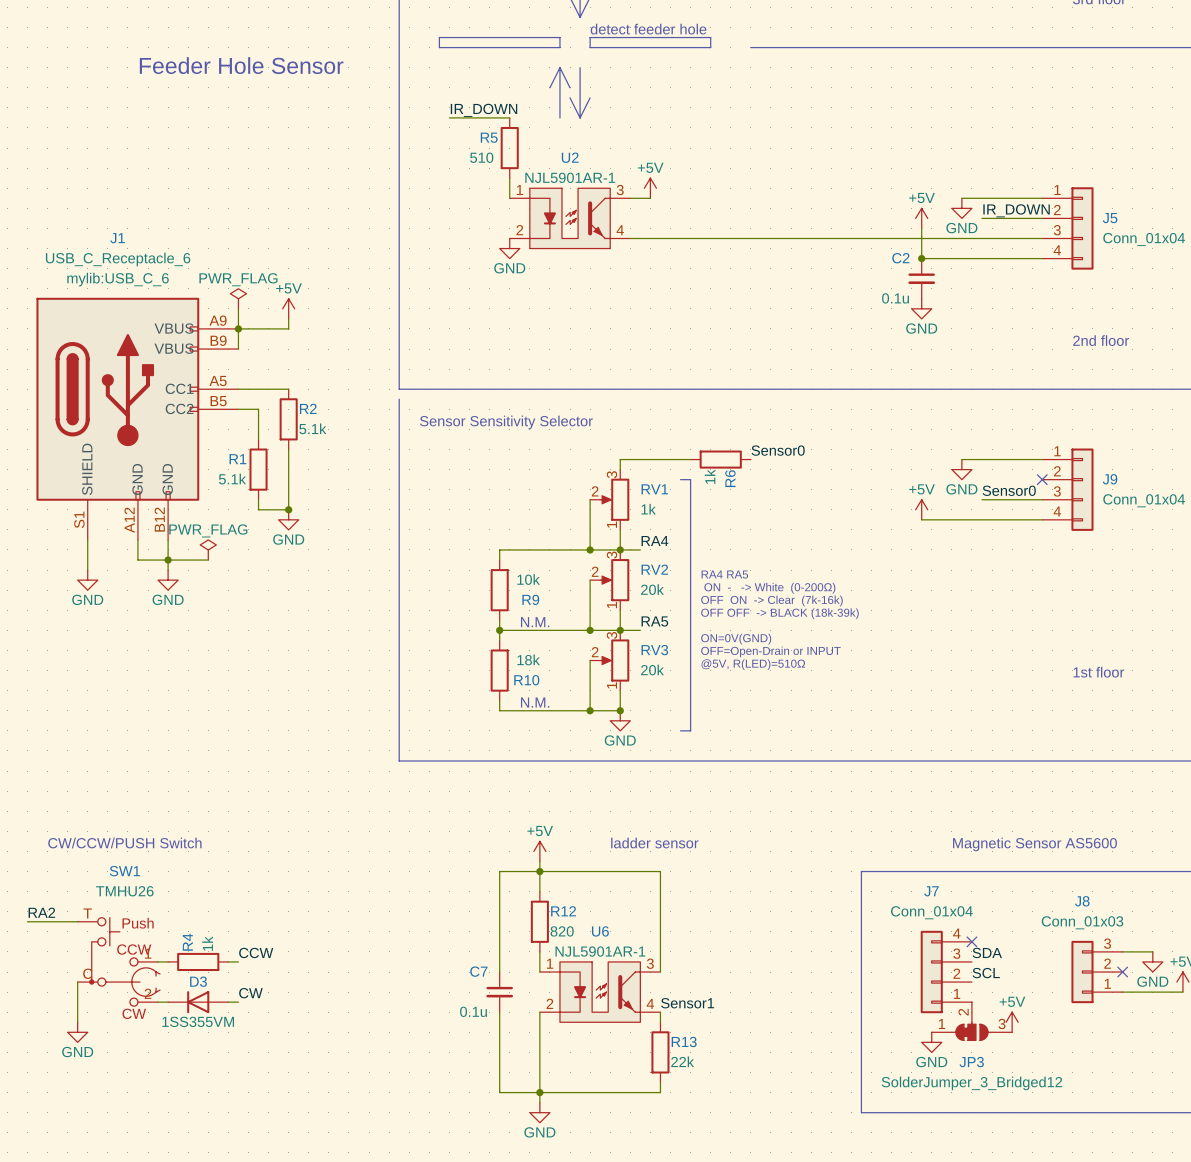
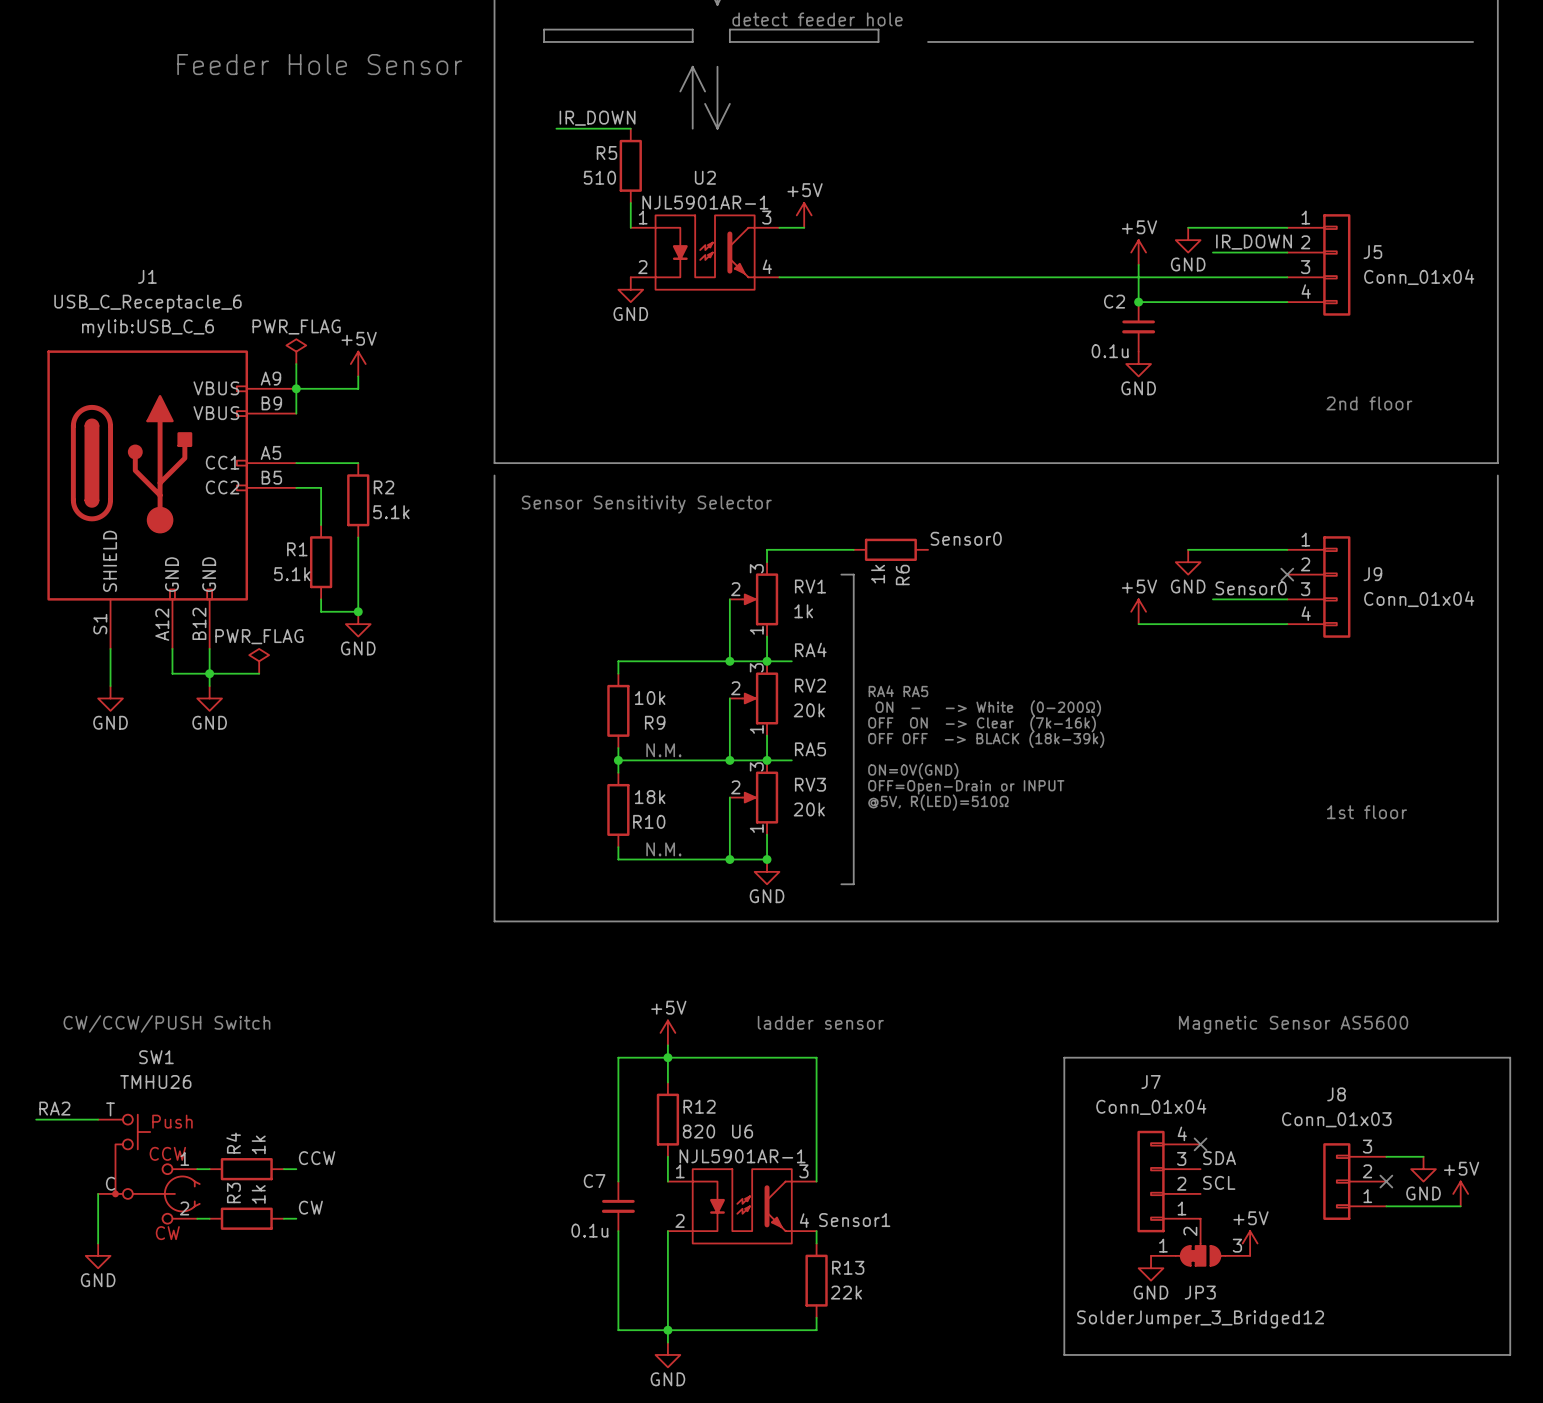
D3: 1SS355VM (198, 1002) -> none
R3: none -> 1k (246, 1218)

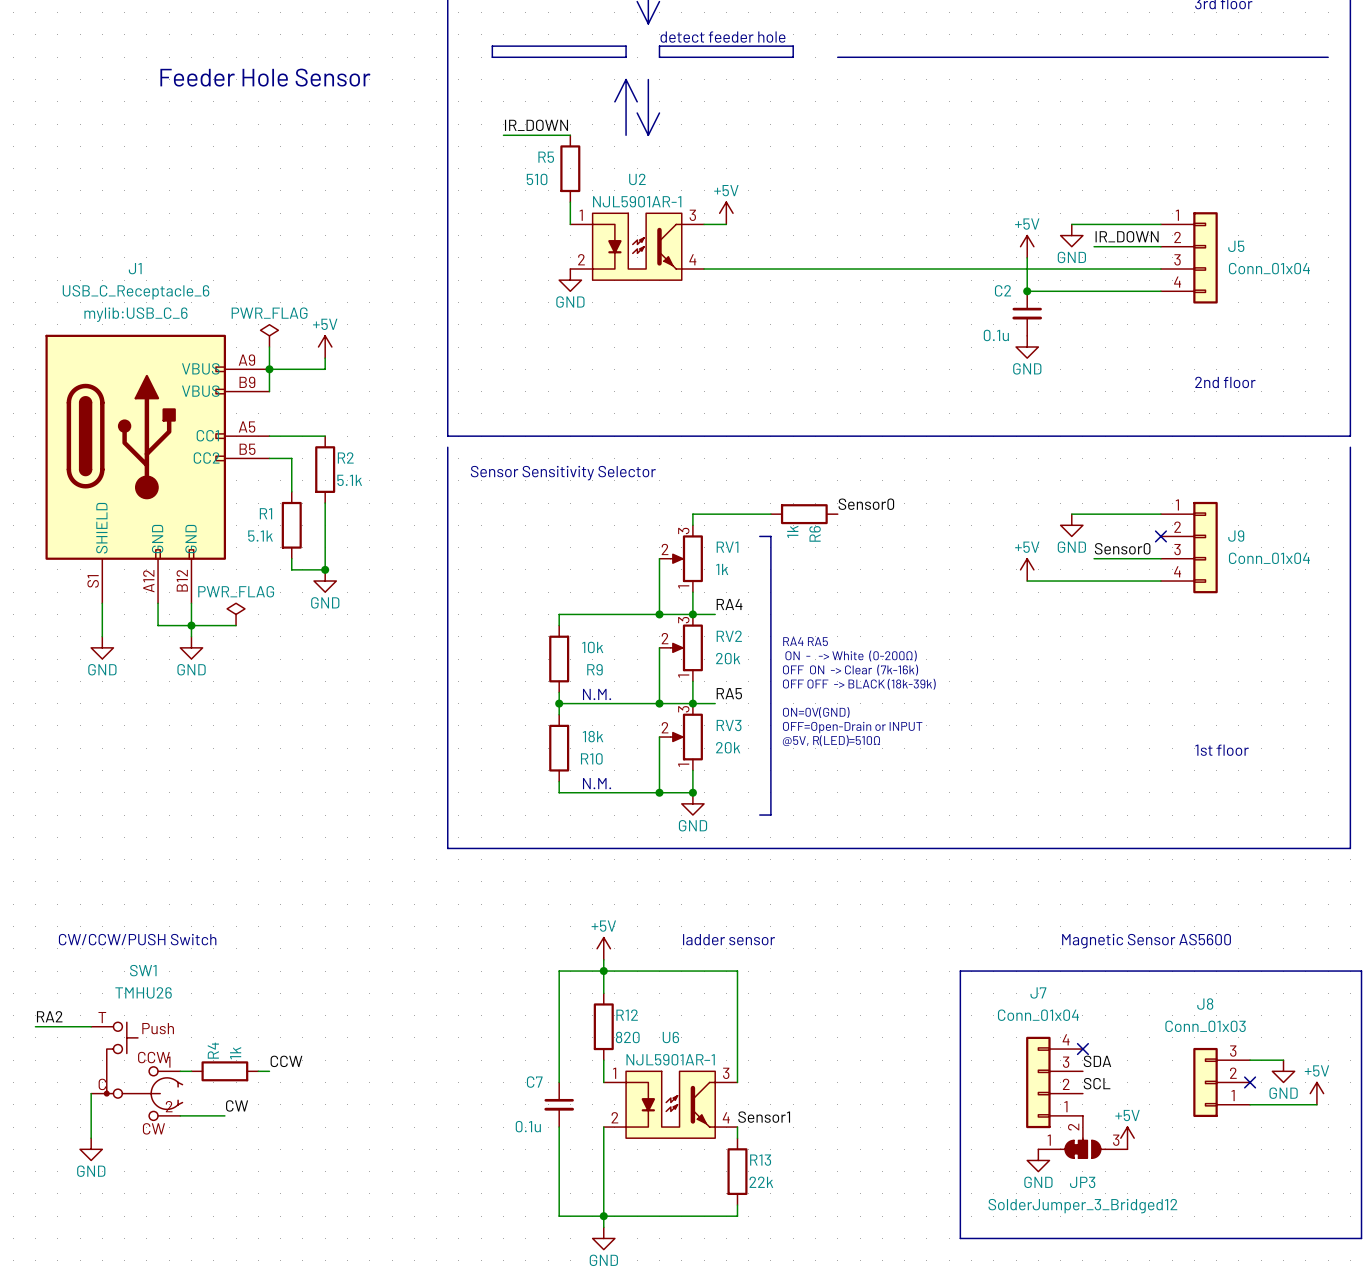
label position: CW (310, 1207) -> CW (237, 1105)
wire: none -> (191, 1115) (224, 1115)
R3: 1k (246, 1218) -> none
wire: (283, 1218) (296, 1218) -> none

